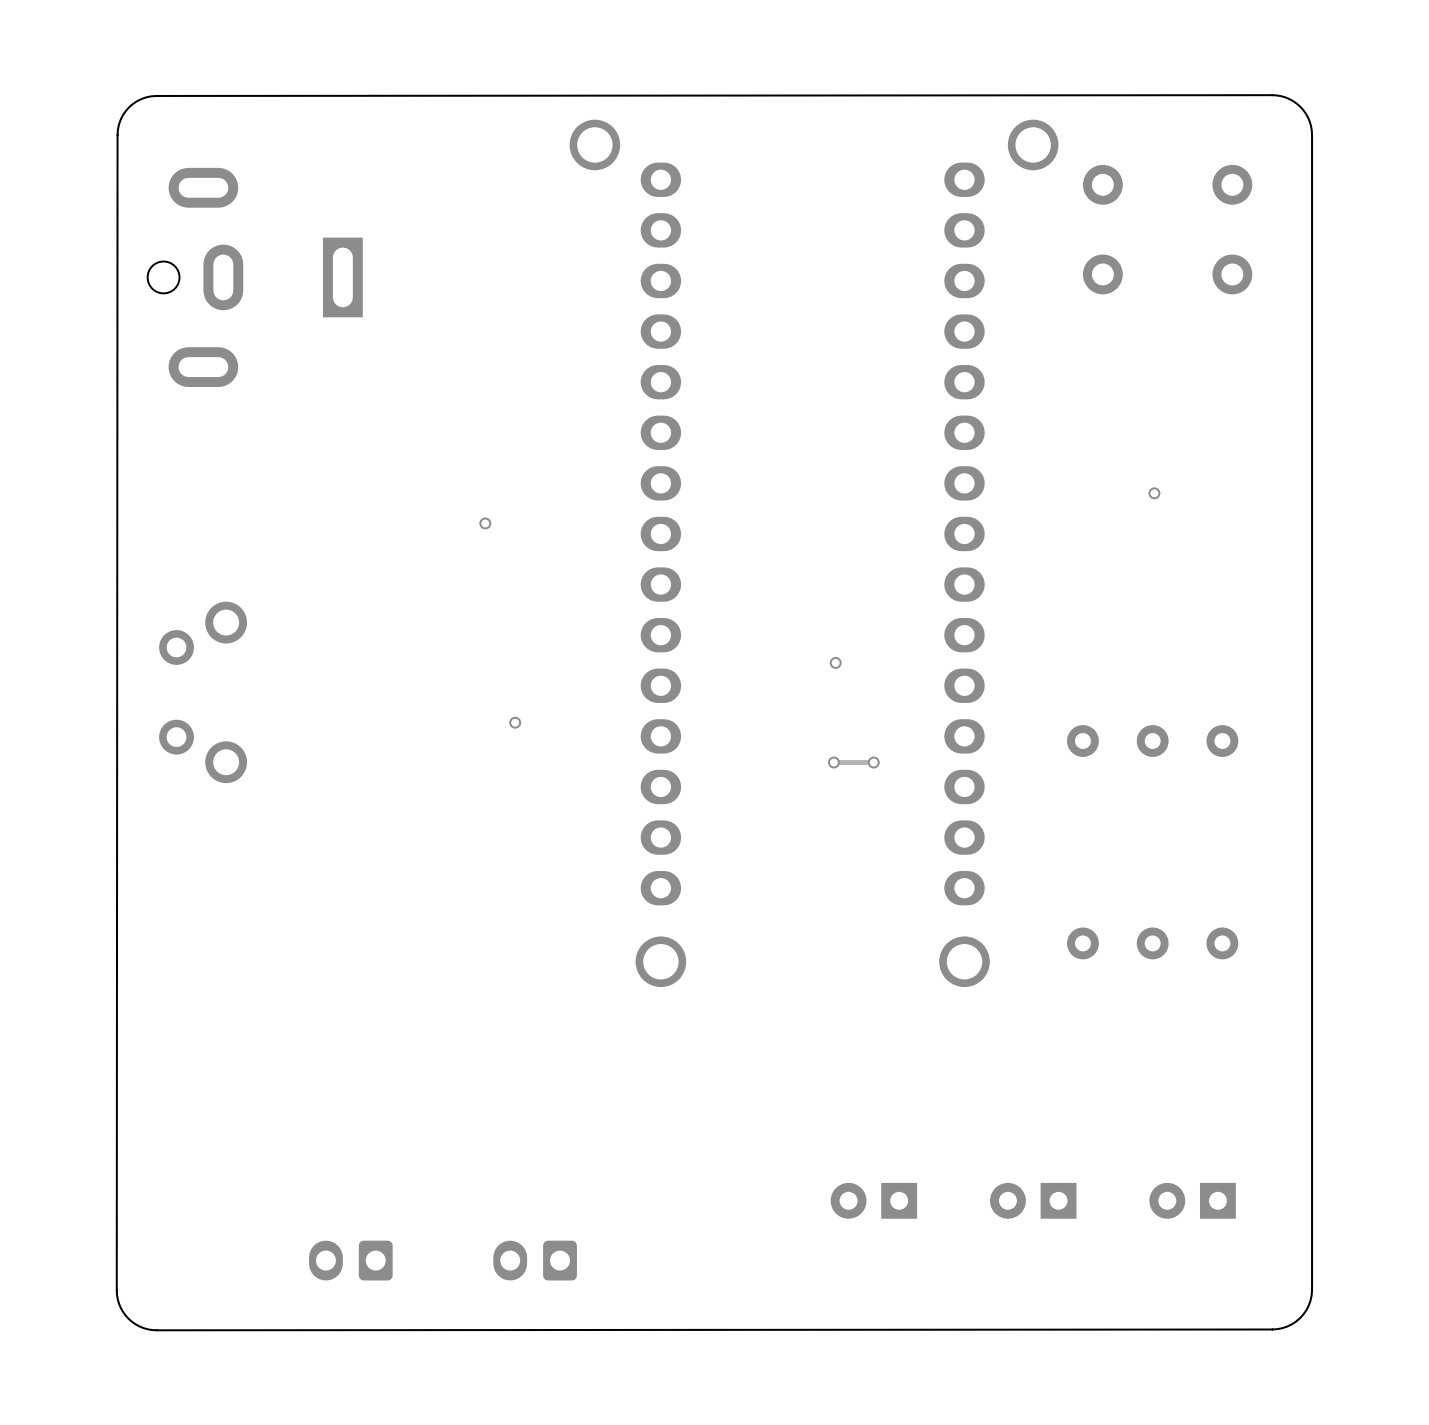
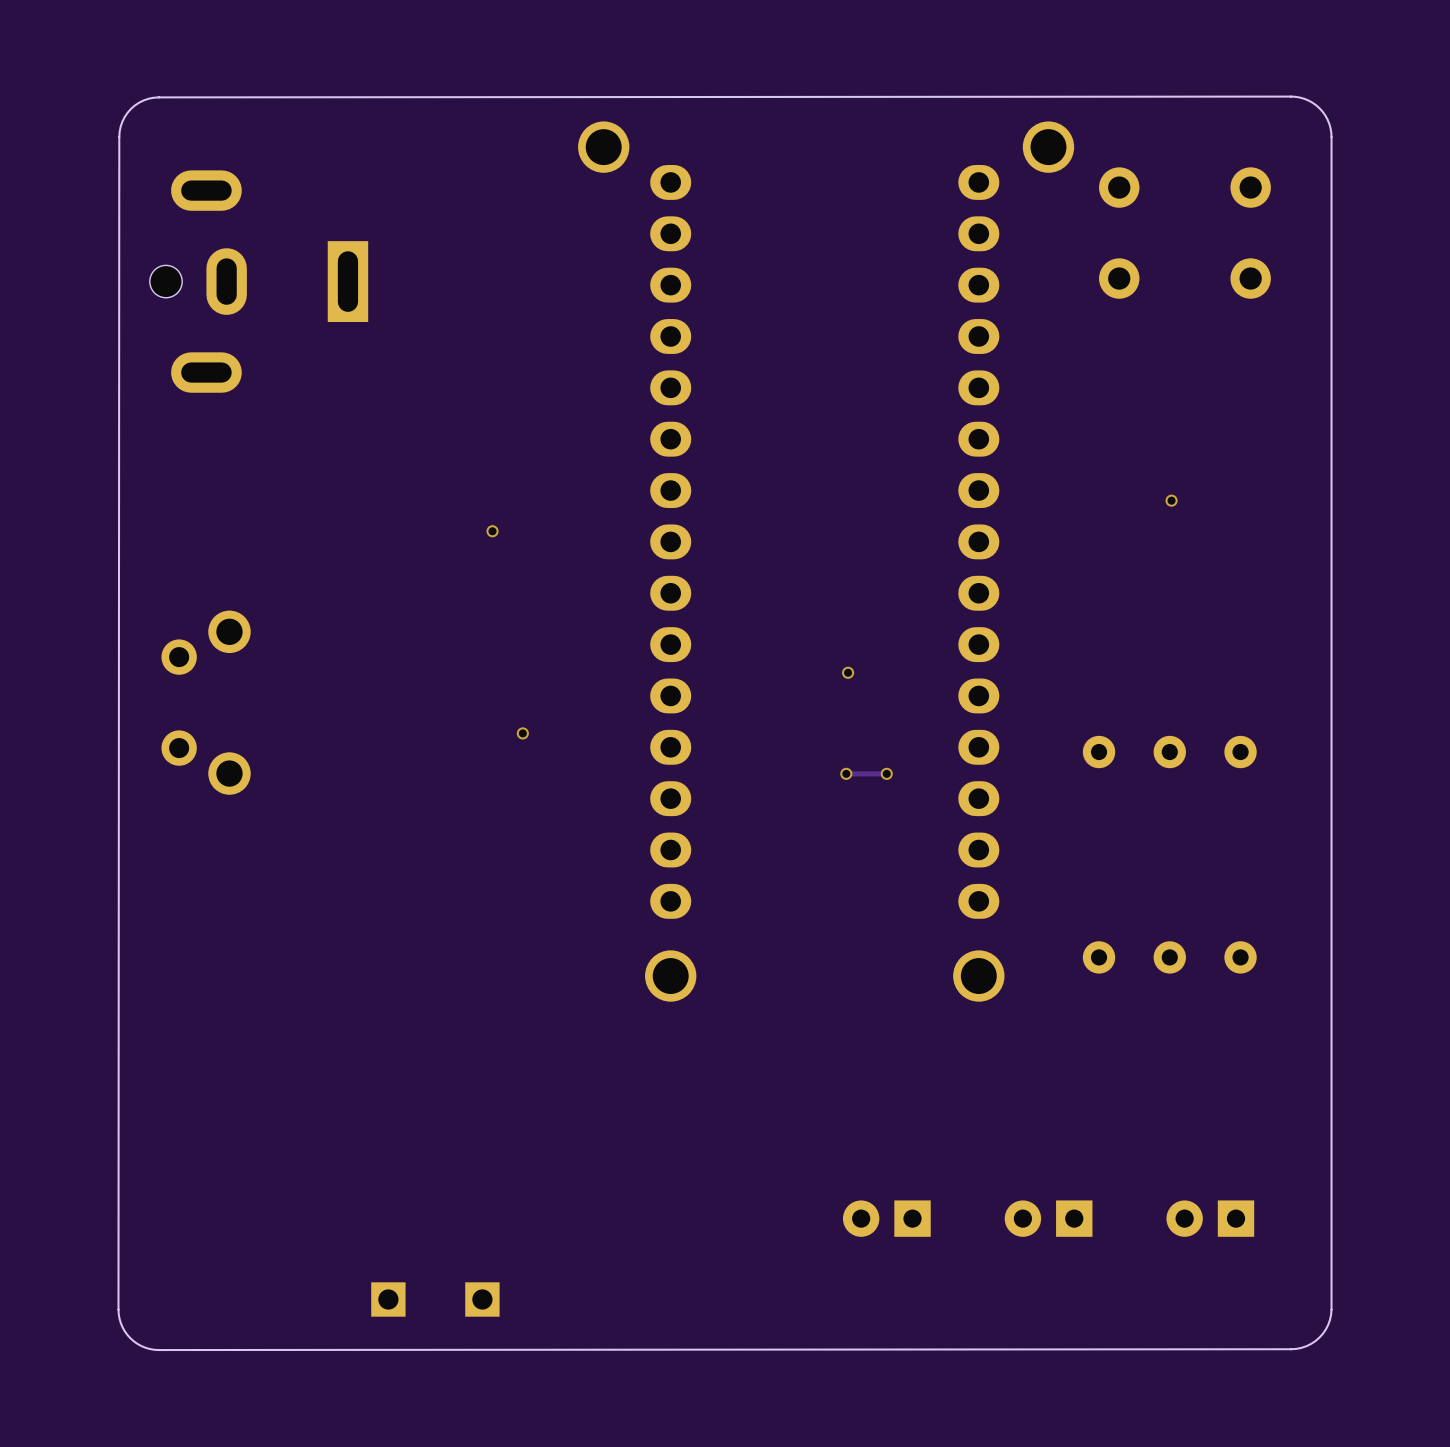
part: (350, 1260) -> none
part: (535, 1260) -> none
part: none -> (388, 1299)
part: none -> (482, 1299)

